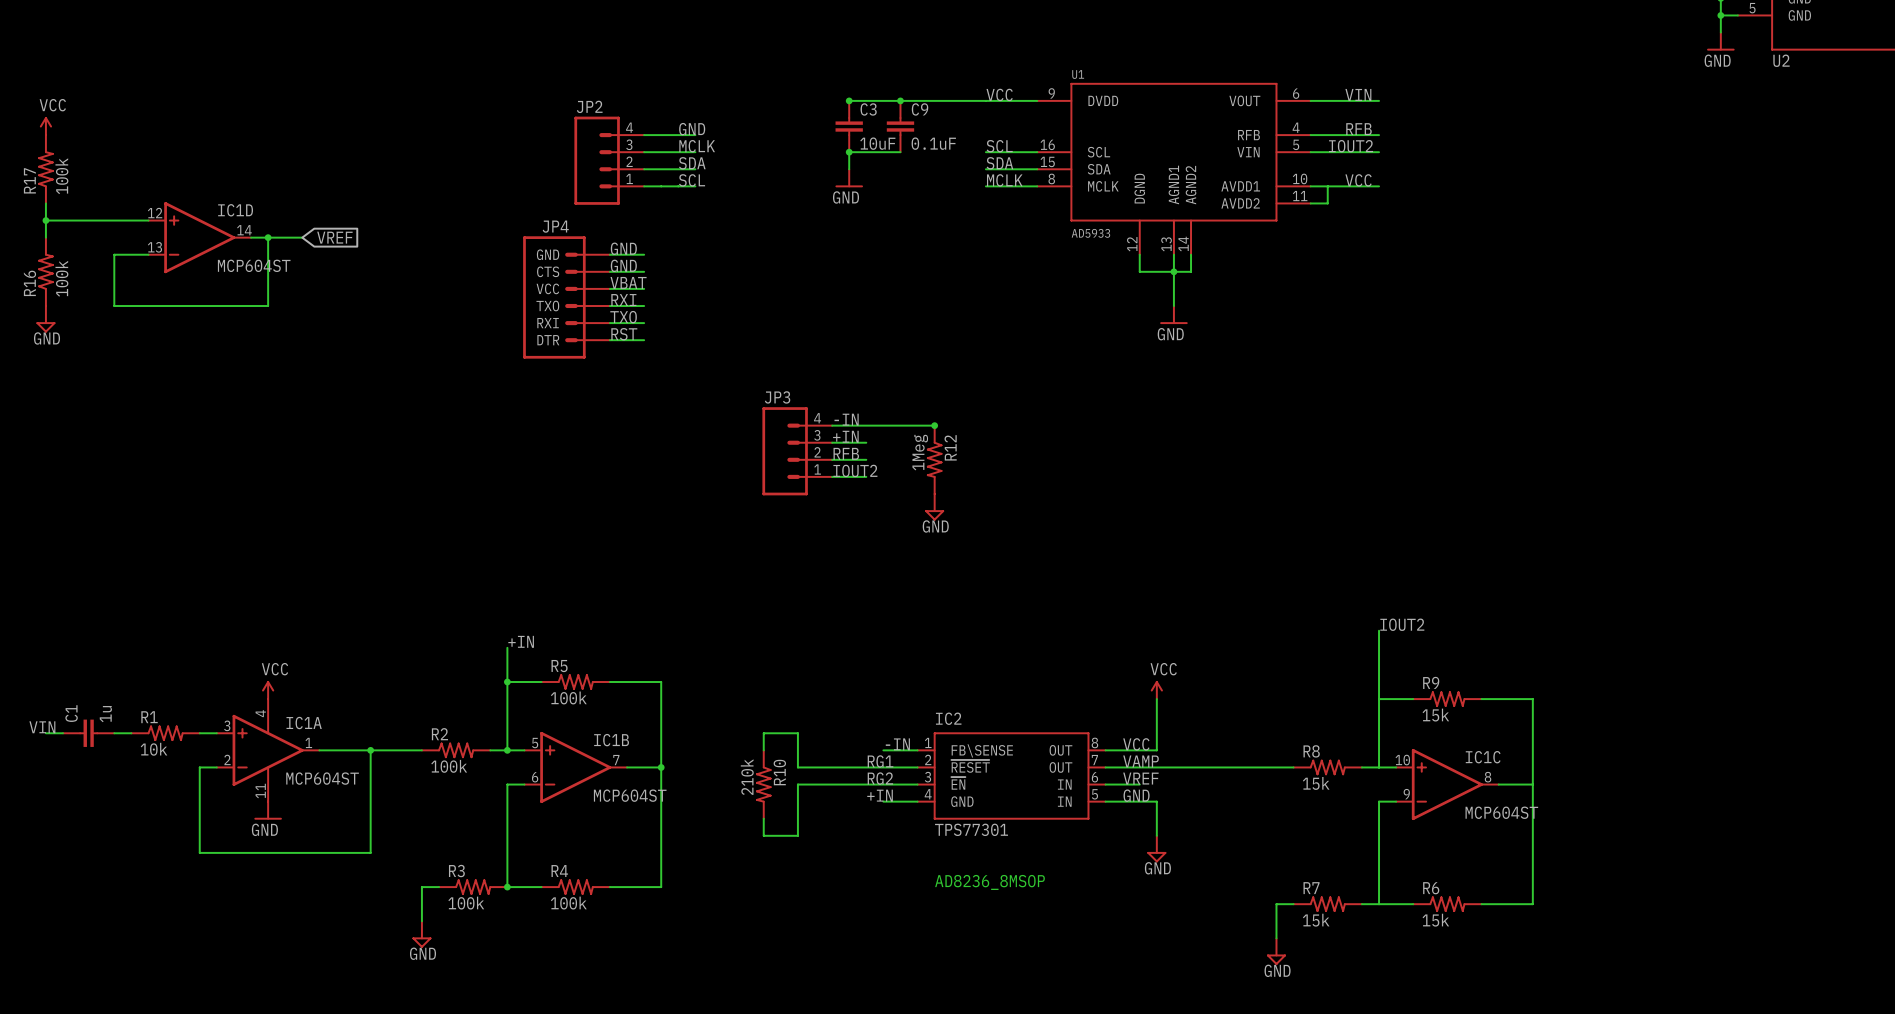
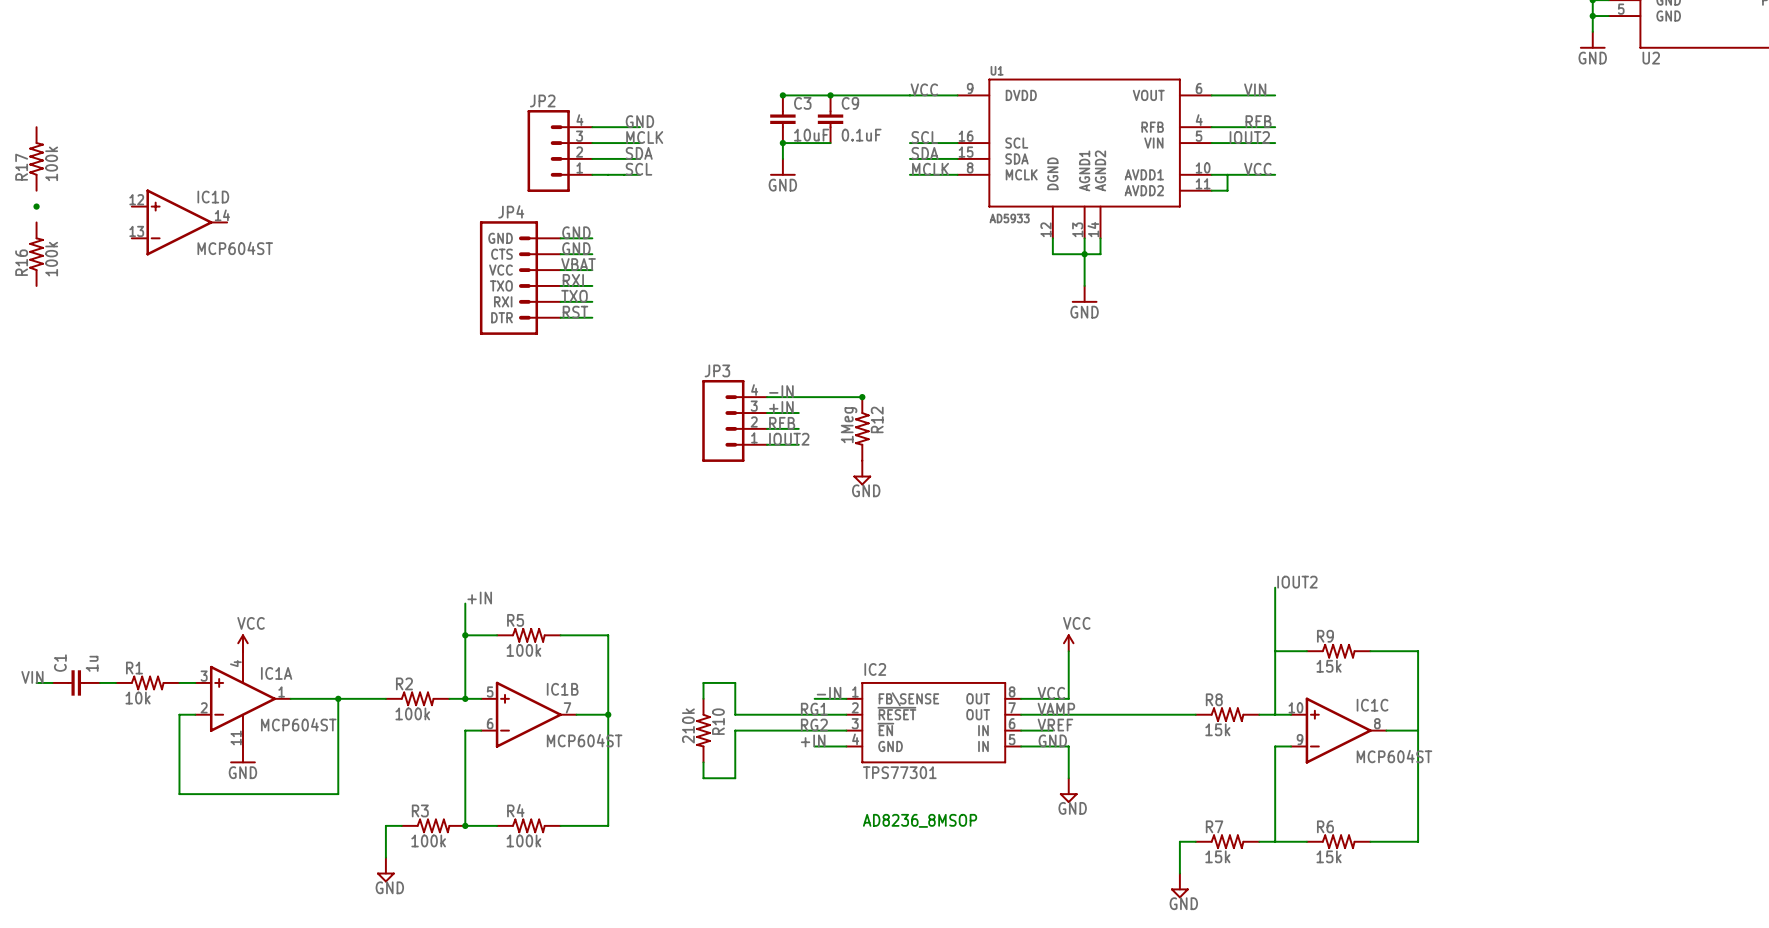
power symbol: VCC (45, 126) -> none
wire: (45, 203) (45, 237) -> none
wire: (45, 220) (148, 220) -> none
wire: (251, 237) (302, 237) -> none
wire: (268, 237) (268, 306) (114, 306) (114, 254) (148, 254) -> none
junction: (268, 237) -> none
global label: VREF (334, 237) -> none
power symbol: GND (45, 319) -> none

